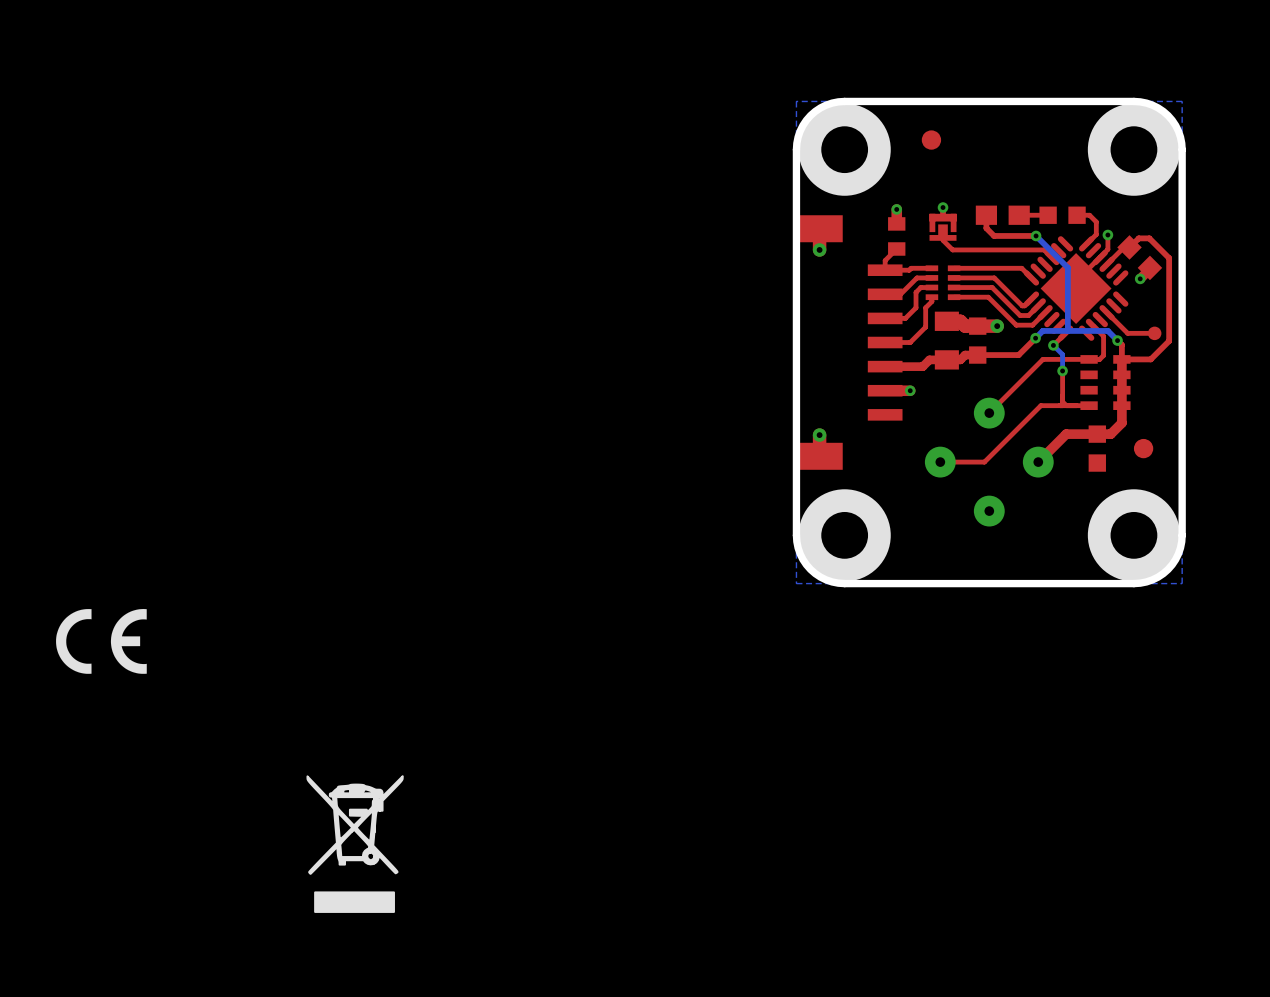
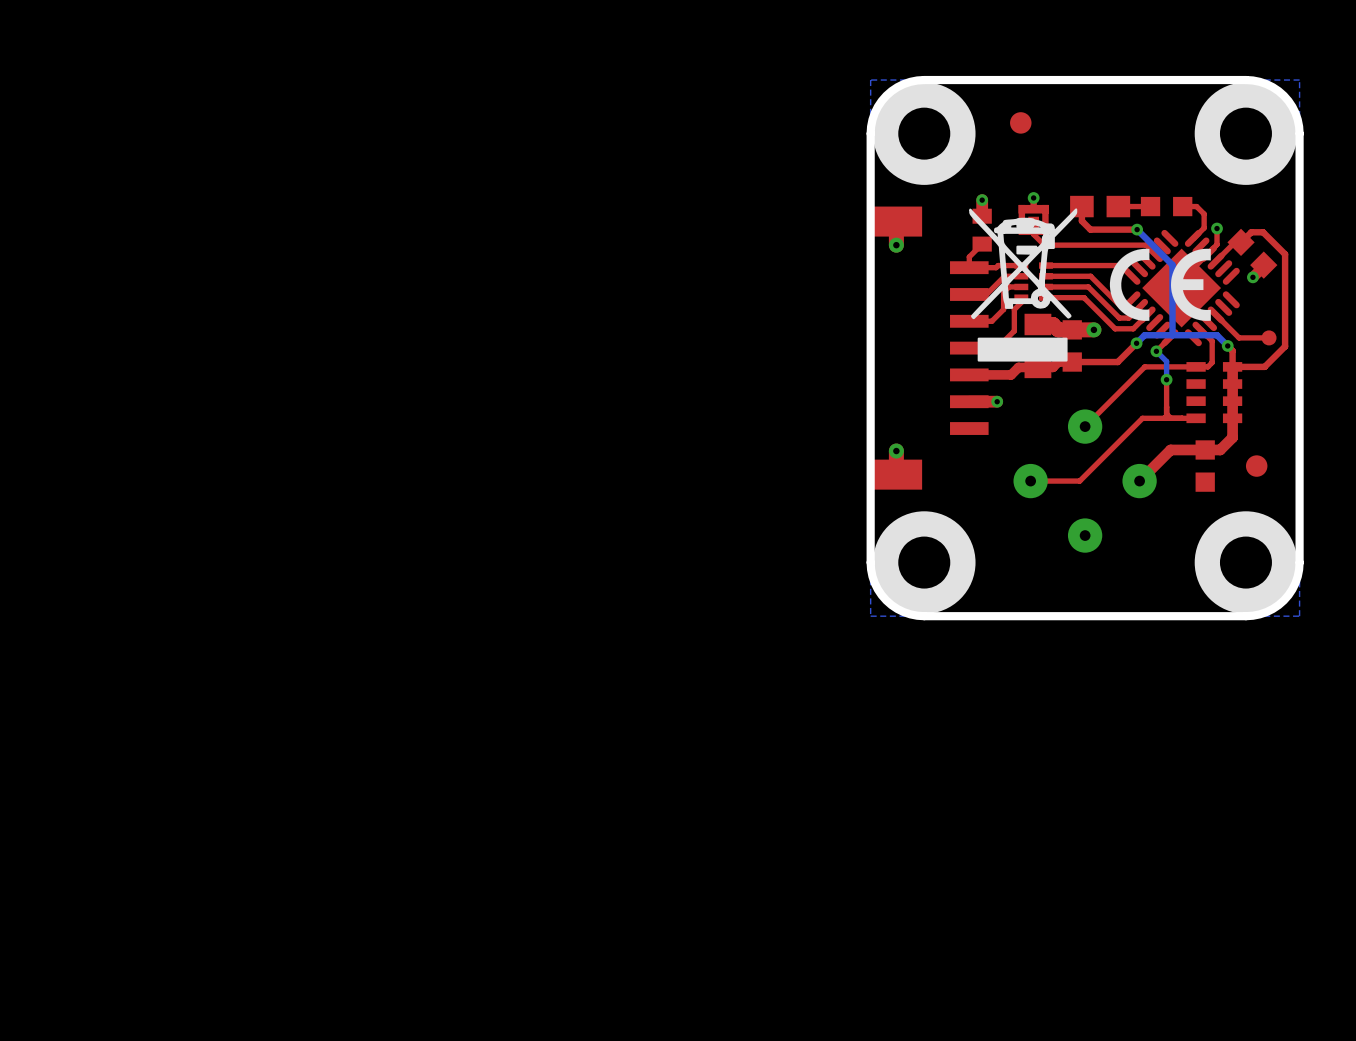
drawing: none -> [969, 208, 1078, 362]
drawing: none -> [1109, 248, 1211, 321]
drawing: [56, 608, 147, 674] -> none
drawing: [306, 775, 404, 913] -> none

